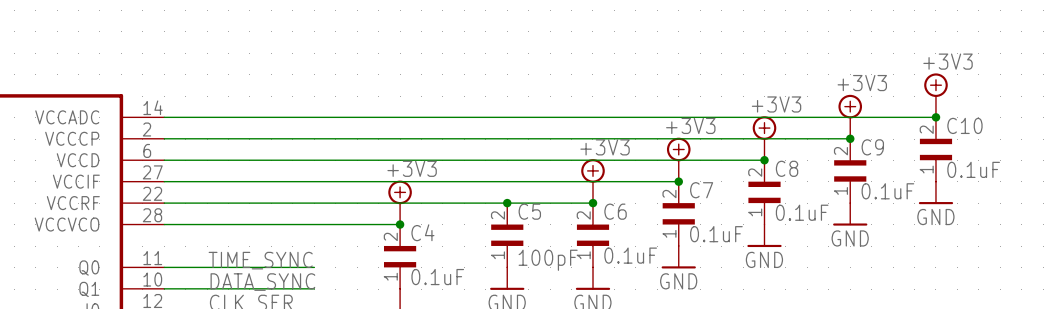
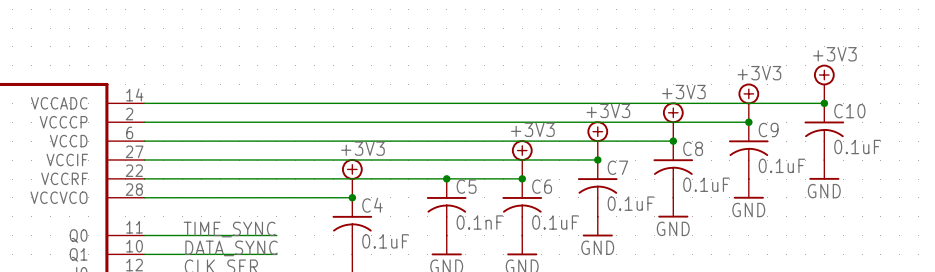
C10 symbol: [919, 117, 953, 182] -> [804, 103, 845, 161]
C9 symbol: [834, 138, 867, 204] -> [728, 122, 769, 180]
C8 symbol: [748, 160, 781, 225] -> [653, 141, 694, 198]
C7 symbol: [662, 181, 695, 246] -> [577, 160, 618, 217]
C5 symbol: [491, 203, 524, 268] -> [426, 179, 467, 236]
C6 symbol: [576, 203, 610, 268] -> [502, 179, 543, 236]
C4 symbol: [383, 224, 417, 289] -> [332, 197, 373, 255]
C5 value: 100pF (548, 260) -> 0.1nF (479, 222)

